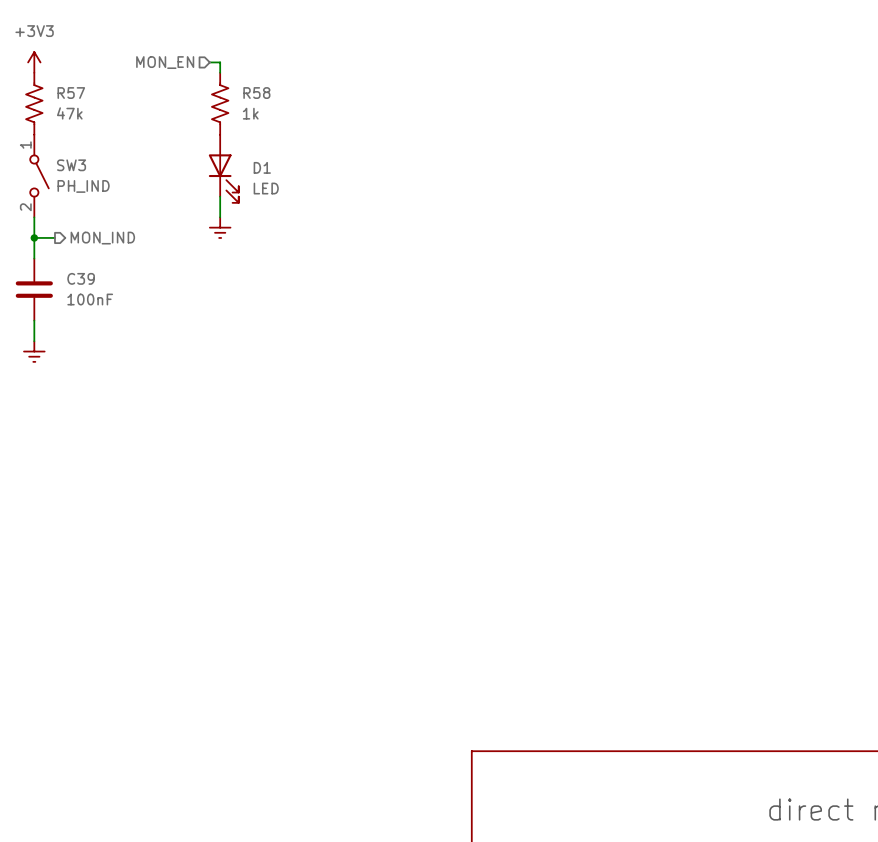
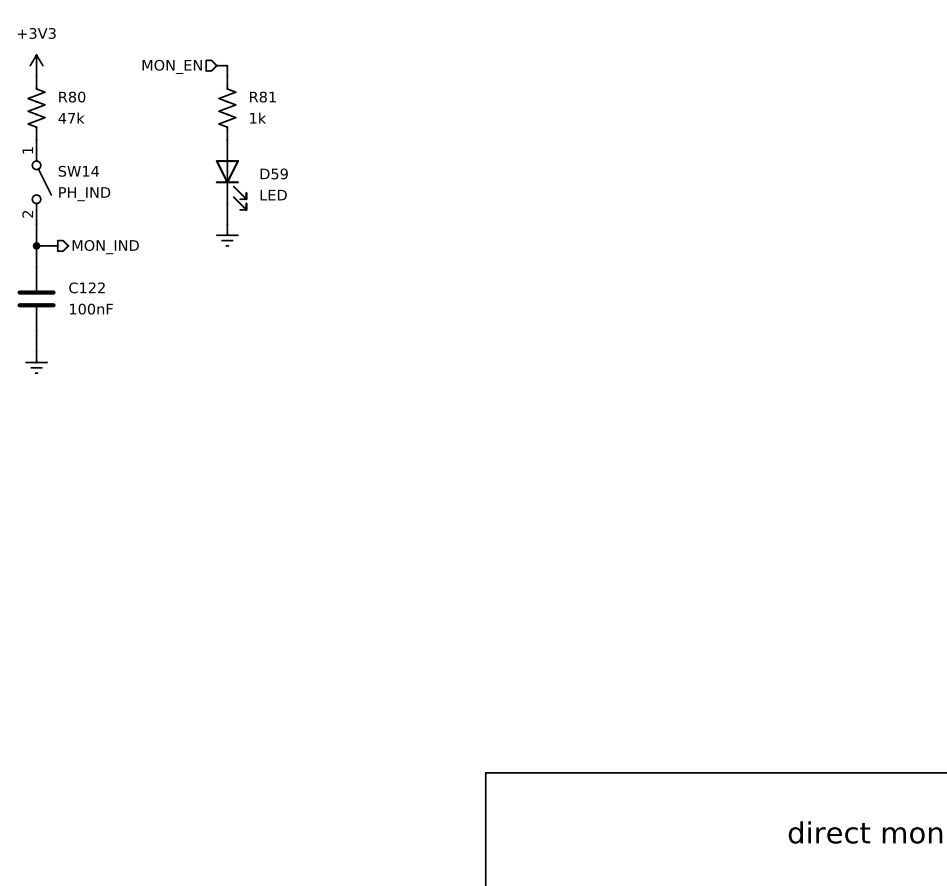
R57 name: R57 (71, 93) -> R80 (72, 97)
R58 name: R58 (256, 93) -> R81 (262, 97)
SW3 name: SW3 (71, 165) -> SW14 (78, 171)
D1 name: D1 (262, 167) -> D59 (274, 173)
C39 name: C39 (81, 278) -> C122 (86, 287)

